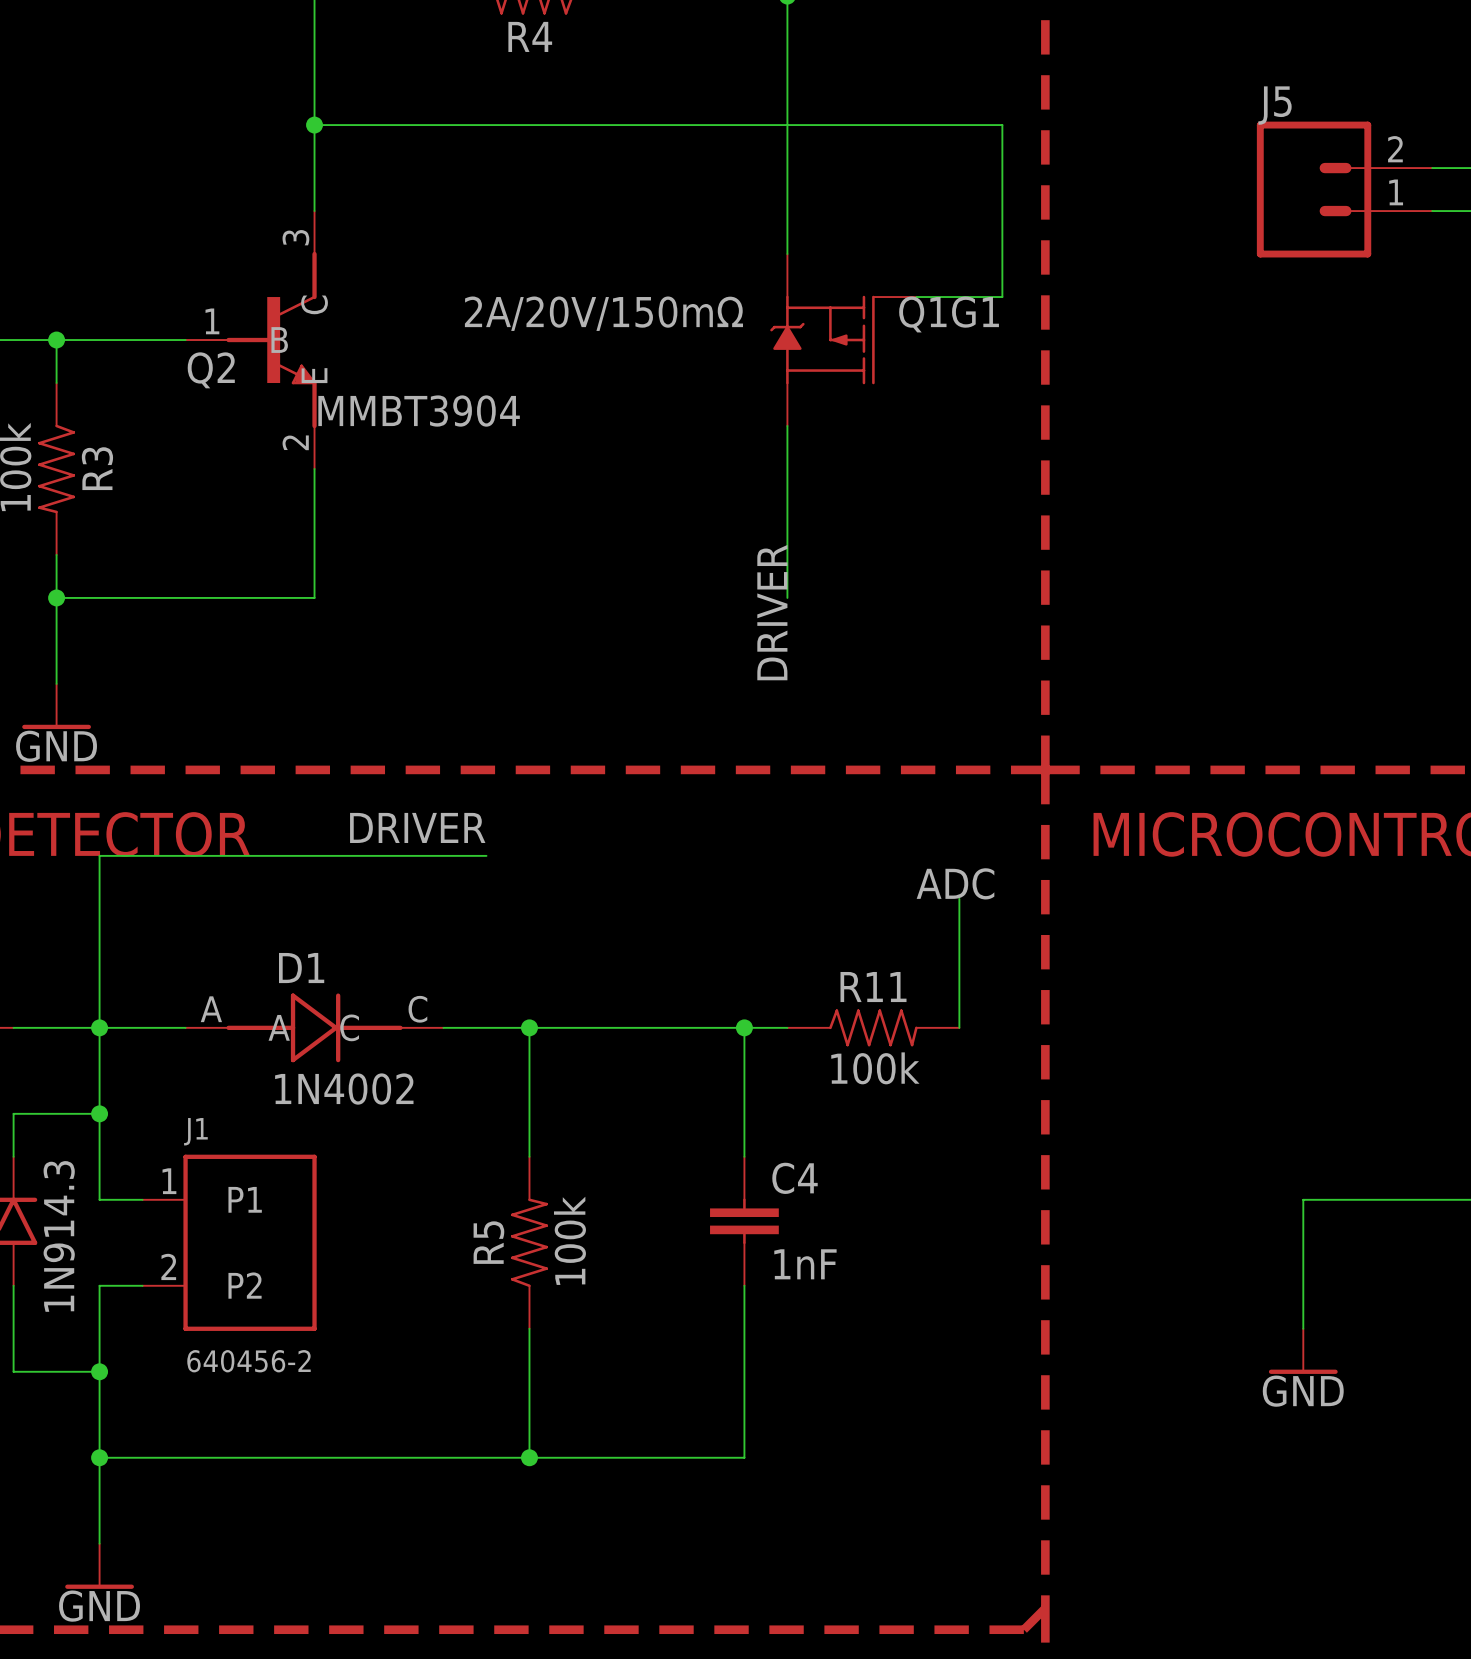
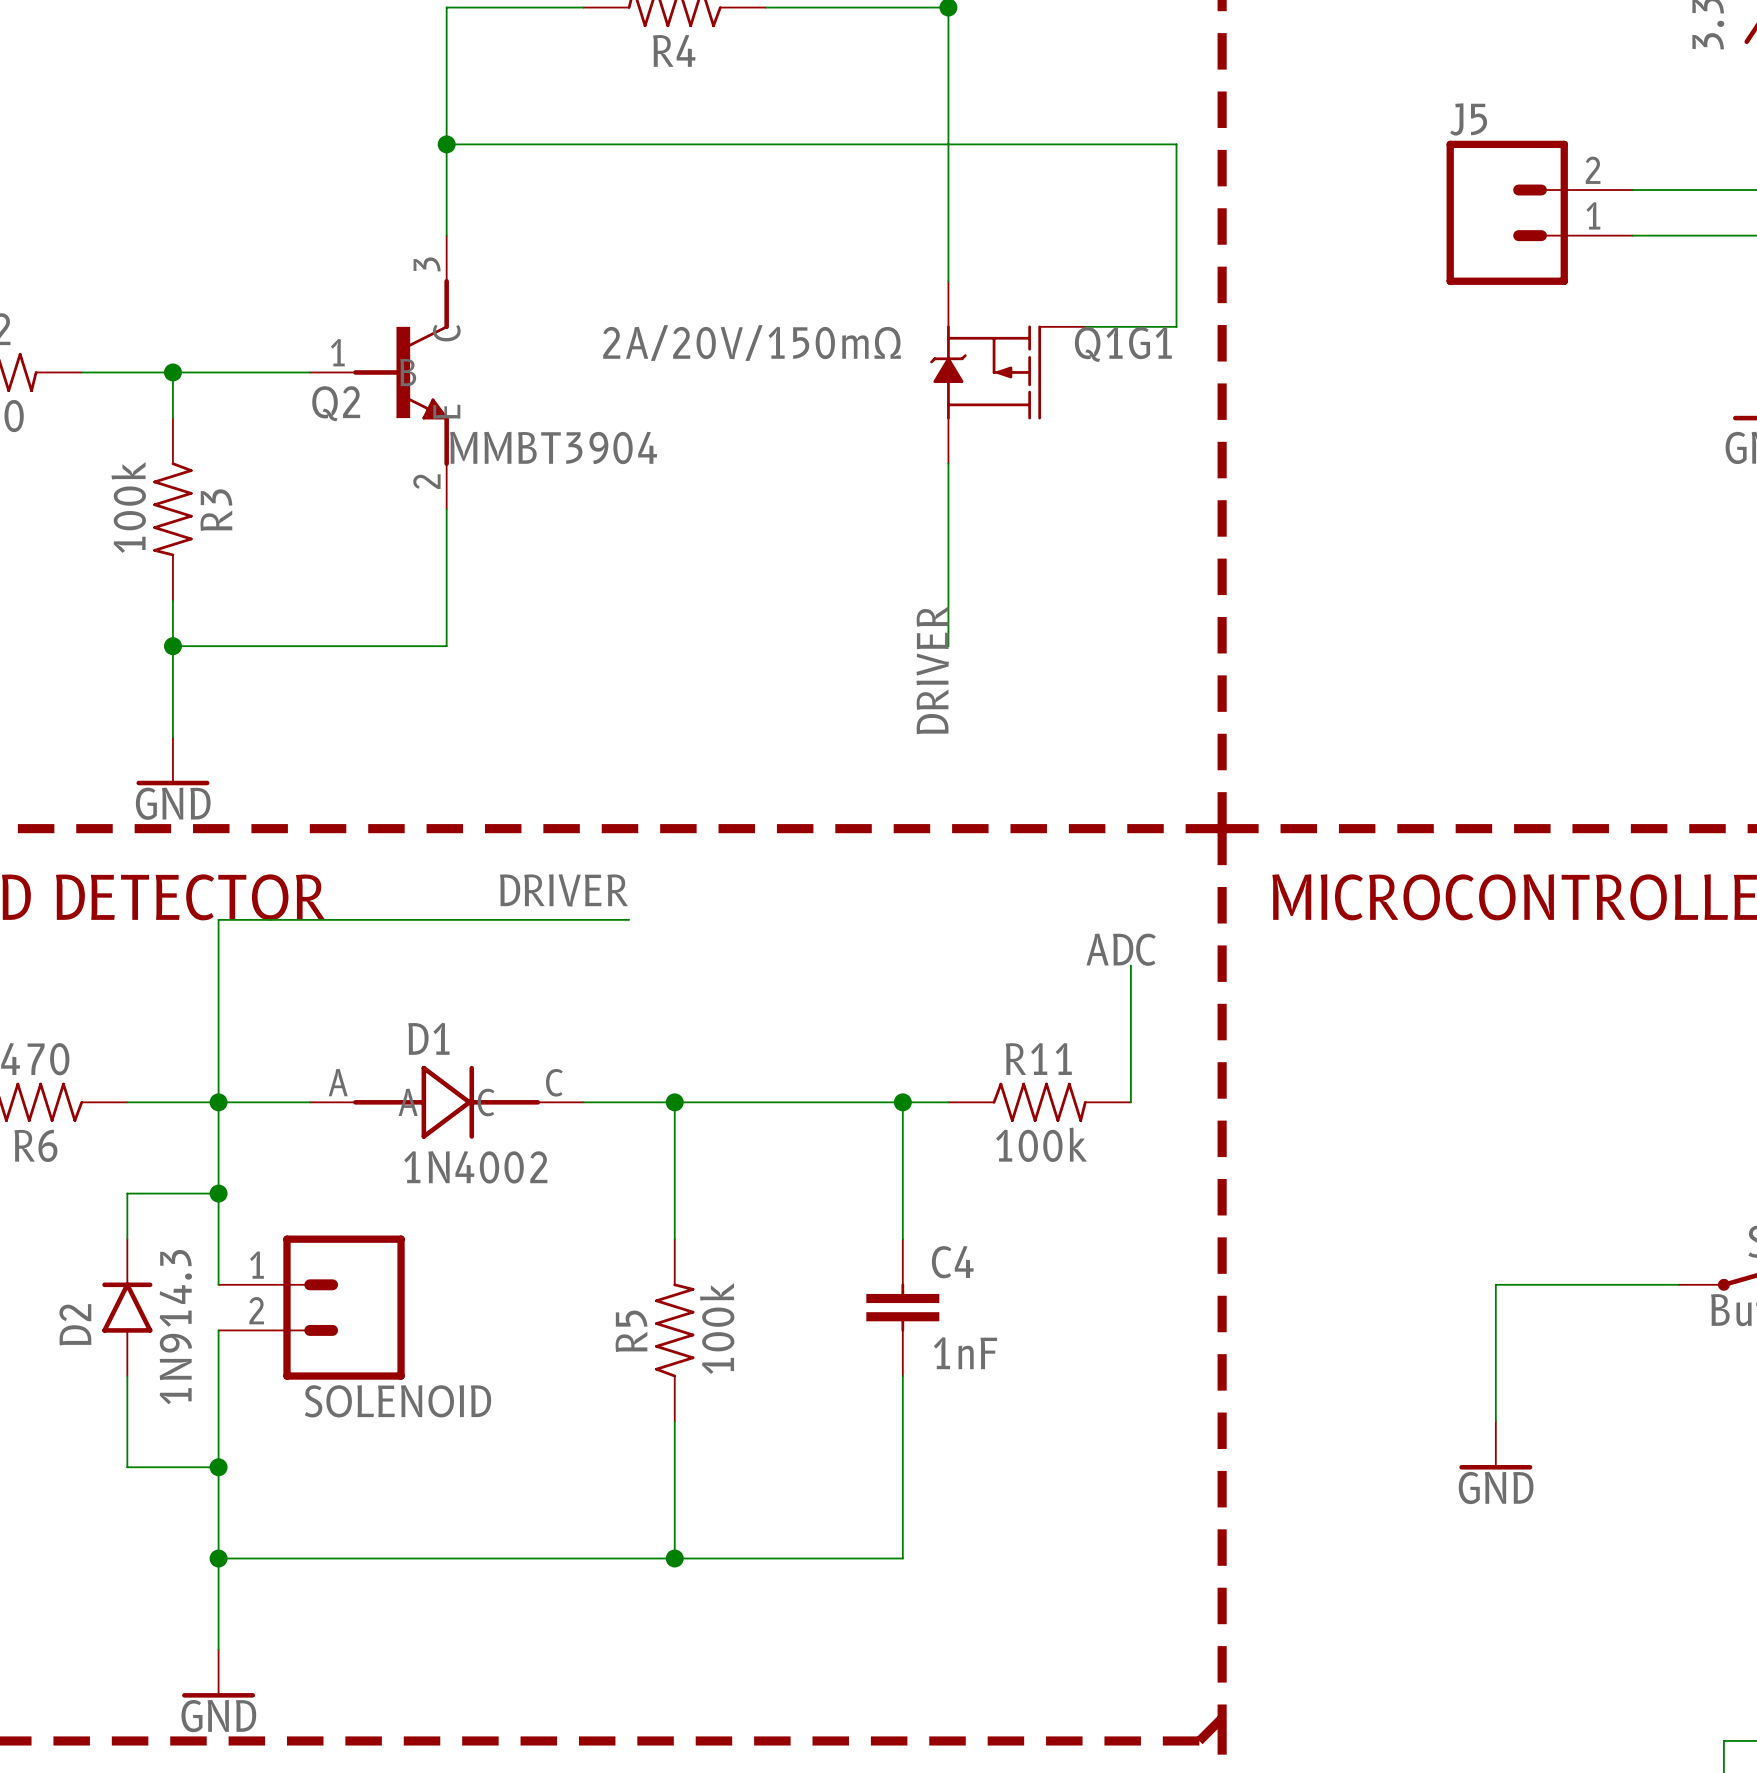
SOLENOID: none -> (311, 1307)
J1: 640456-2 (229, 1242) -> none
wire: (99, 1285) (142, 1285) -> (218, 1376) (218, 1330)

